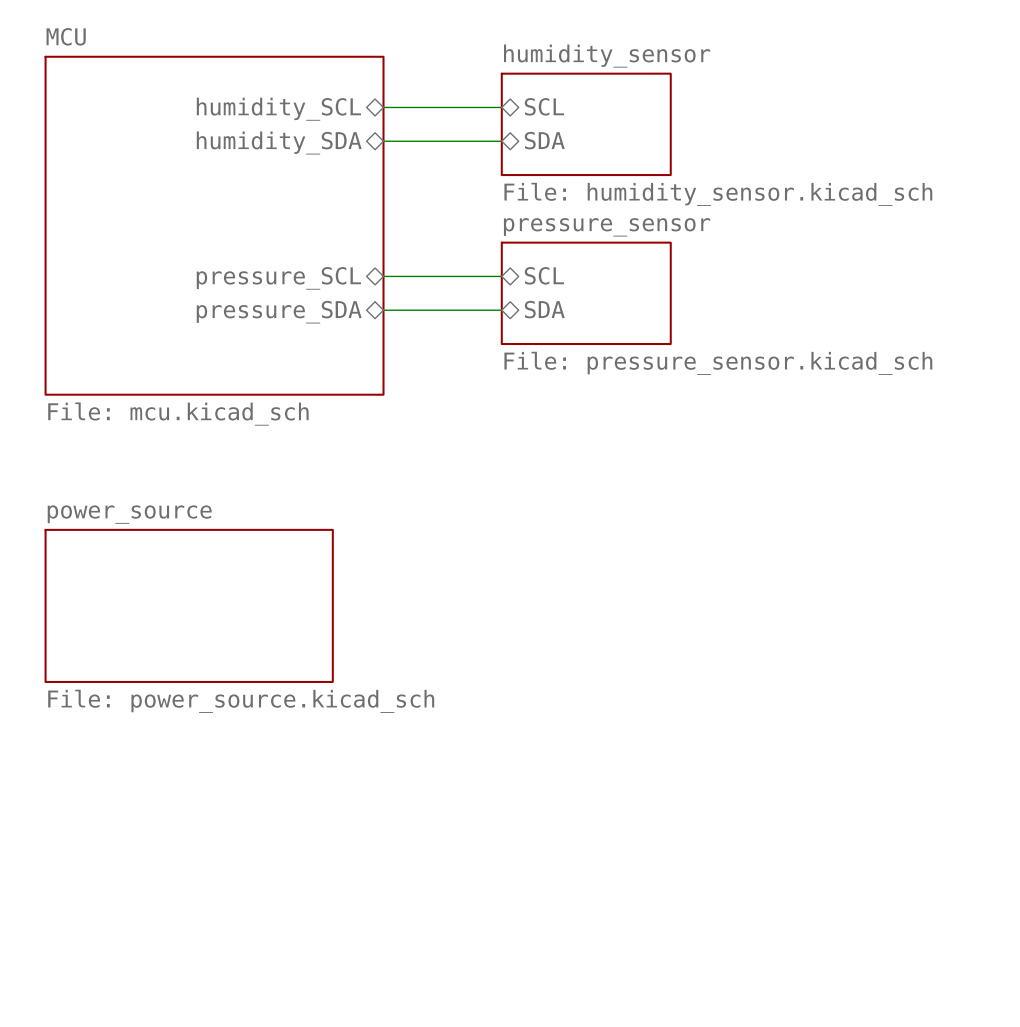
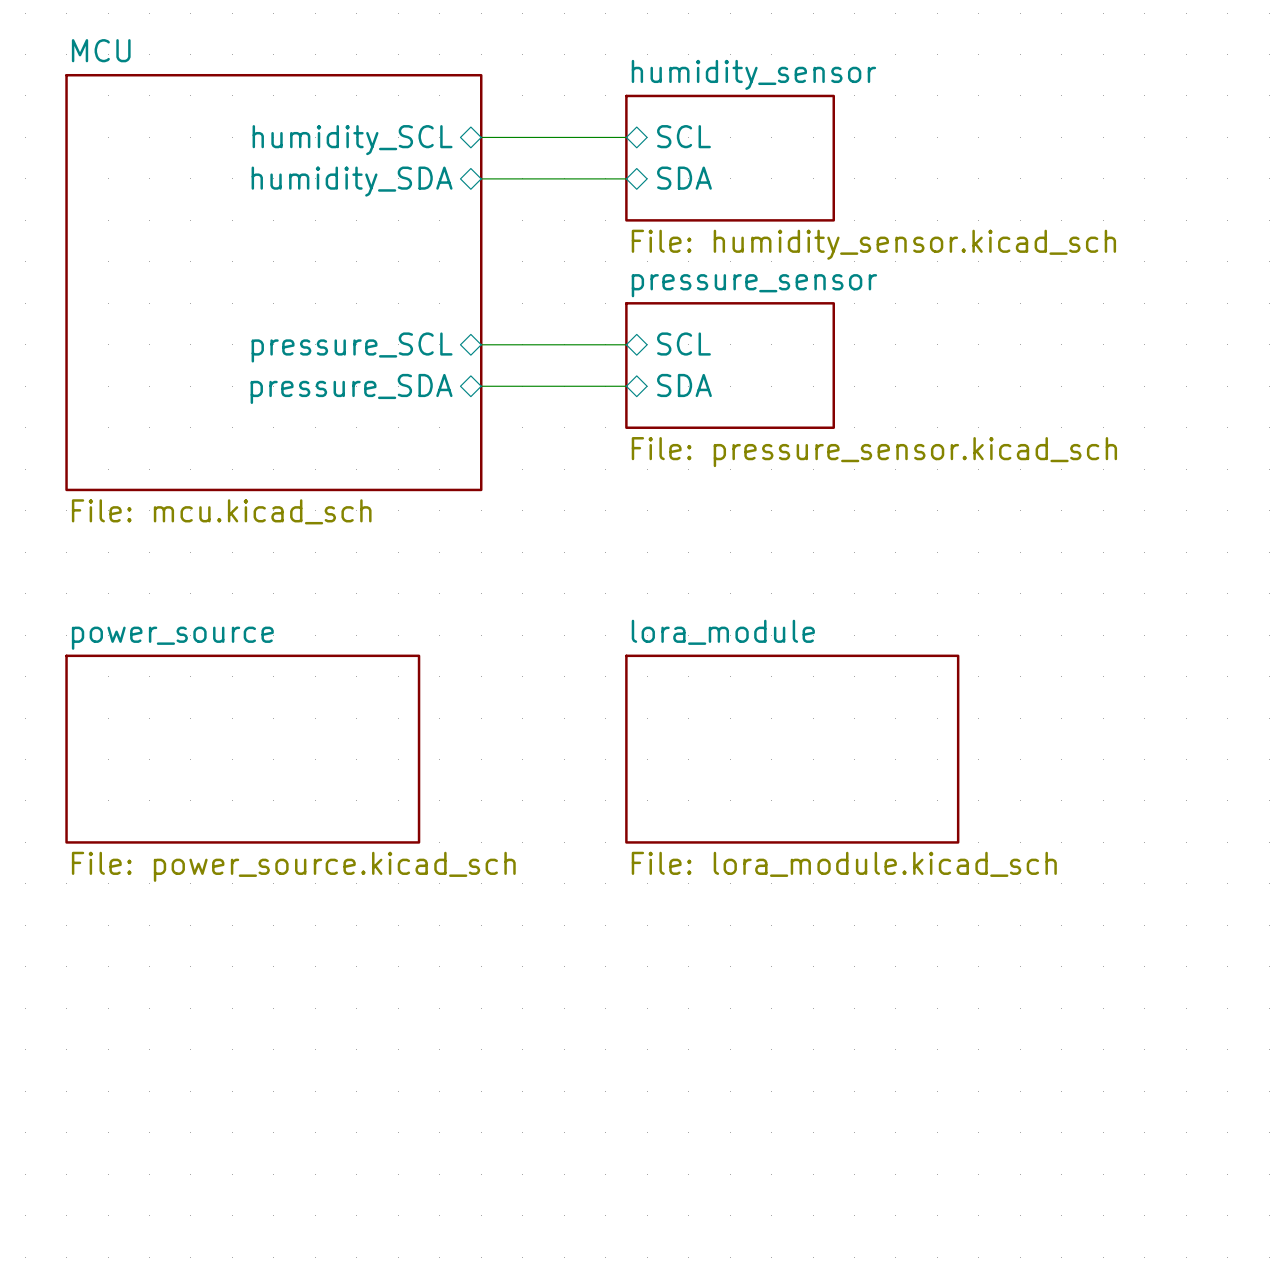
sheet lora_module: none -> File: lora_module.kicad_sch (792, 749)

